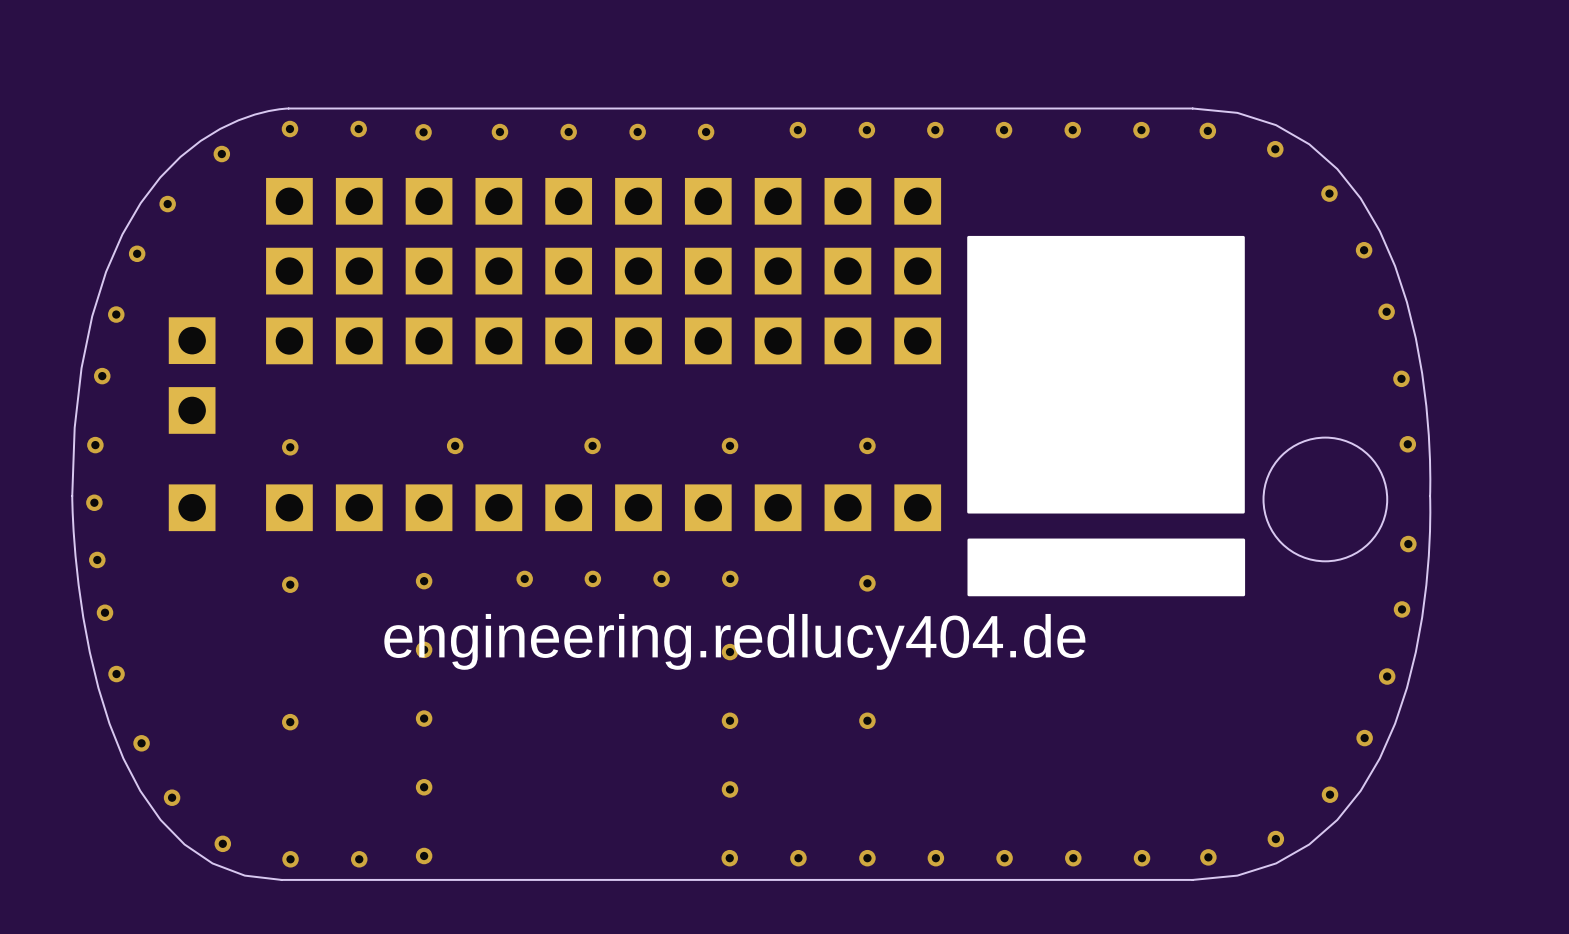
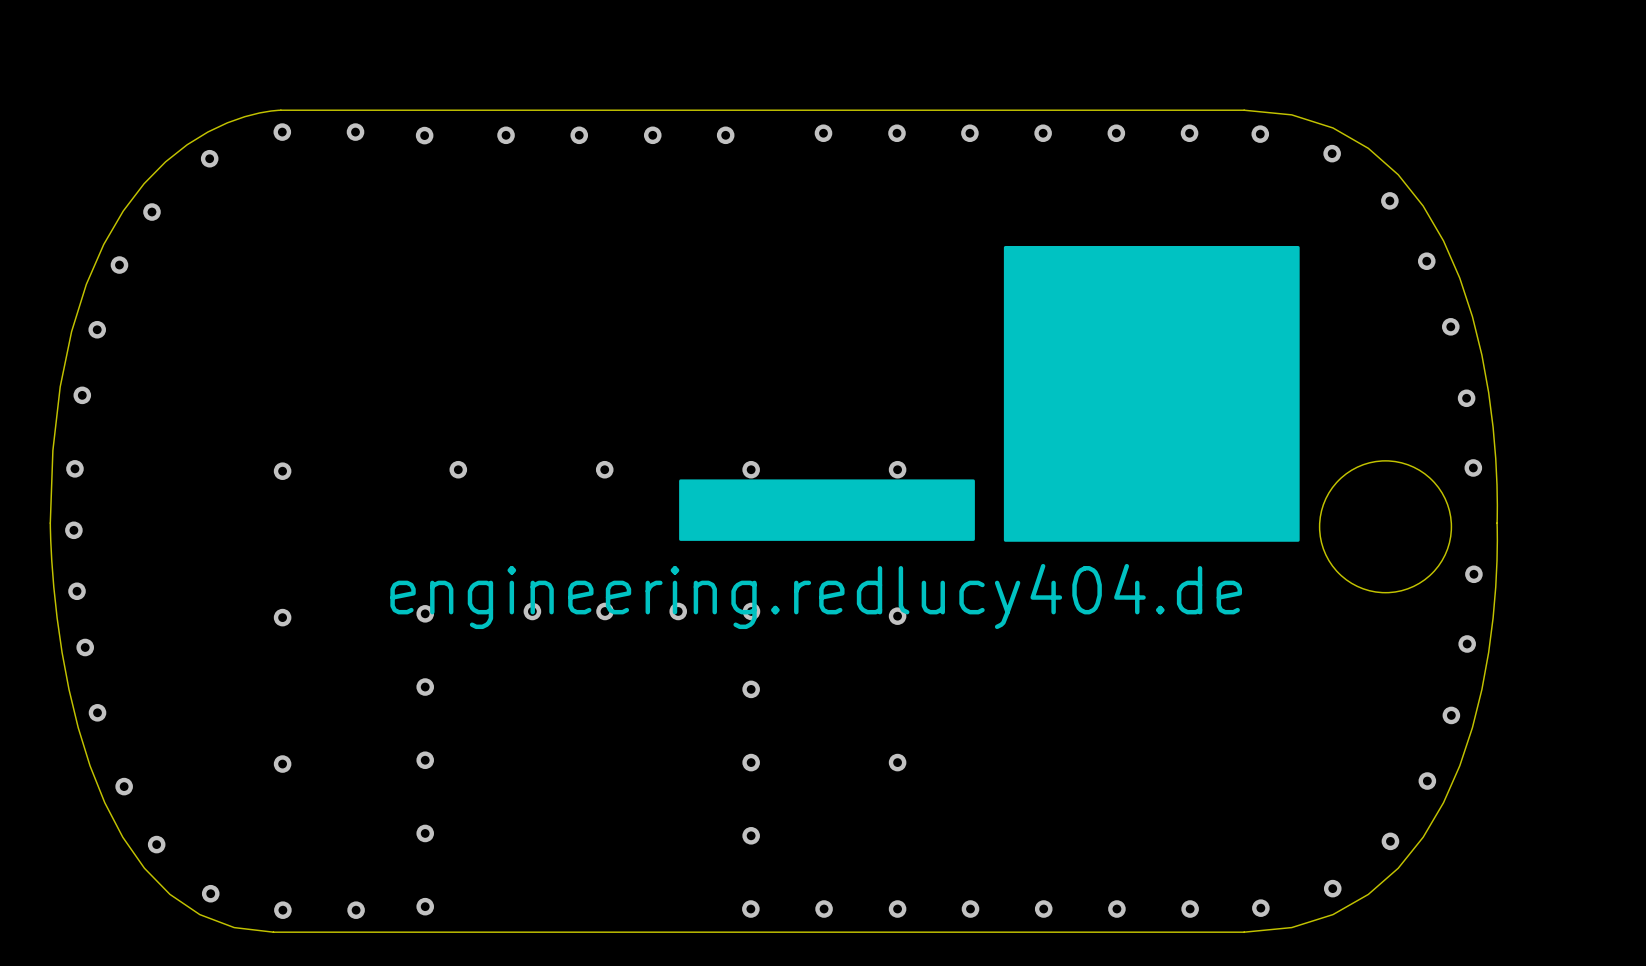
part: (289, 201) -> none
part: (359, 201) -> none
part: (429, 201) -> none
part: (498, 201) -> none
part: (568, 201) -> none
part: (638, 201) -> none
part: (708, 201) -> none
part: (778, 201) -> none
part: (847, 201) -> none
part: (917, 201) -> none
part: (289, 271) -> none
part: (359, 271) -> none
part: (429, 271) -> none
part: (498, 271) -> none
part: (568, 271) -> none
part: (638, 271) -> none
part: (708, 271) -> none
part: (778, 271) -> none
part: (847, 271) -> none
part: (917, 271) -> none
part: (192, 340) -> none
part: (289, 340) -> none
part: (359, 340) -> none
part: (429, 340) -> none
part: (498, 340) -> none
part: (568, 340) -> none
part: (638, 340) -> none
part: (708, 340) -> none
part: (778, 340) -> none
part: (847, 340) -> none
part: (917, 340) -> none
part: (192, 410) -> none
part: (192, 507) -> none
part: (289, 507) -> none
part: (359, 507) -> none
part: (429, 507) -> none
part: (498, 507) -> none
part: (568, 507) -> none
part: (638, 507) -> none
part: (708, 507) -> none
part: (778, 507) -> none
part: (847, 507) -> none
part: (917, 507) -> none
drawing position: (1106, 567) -> (827, 510)
text position: engineering.redlucy404.de (734, 641) -> engineering.redlucy404.de (816, 596)

